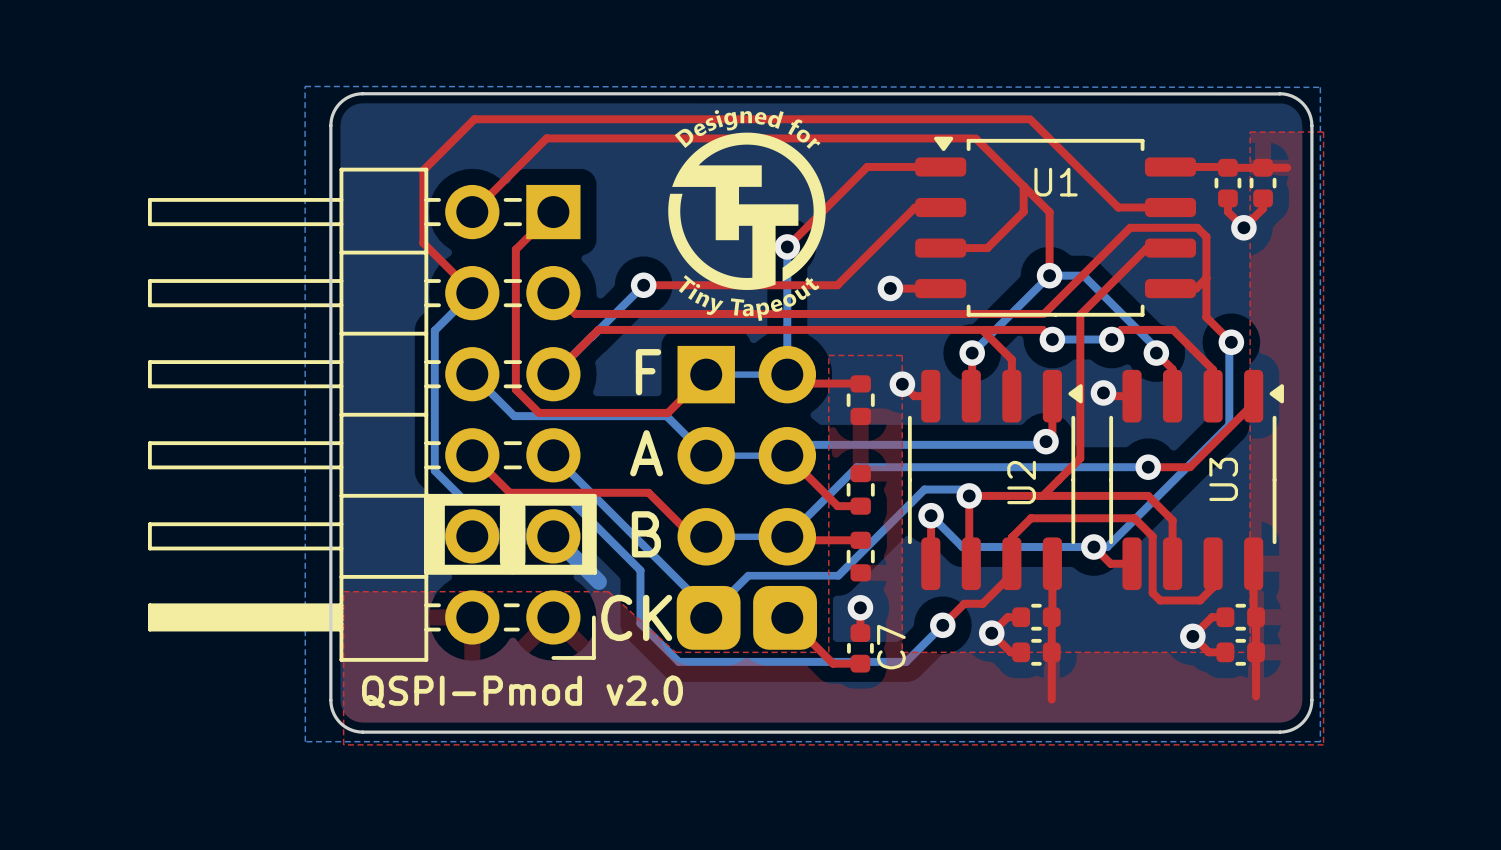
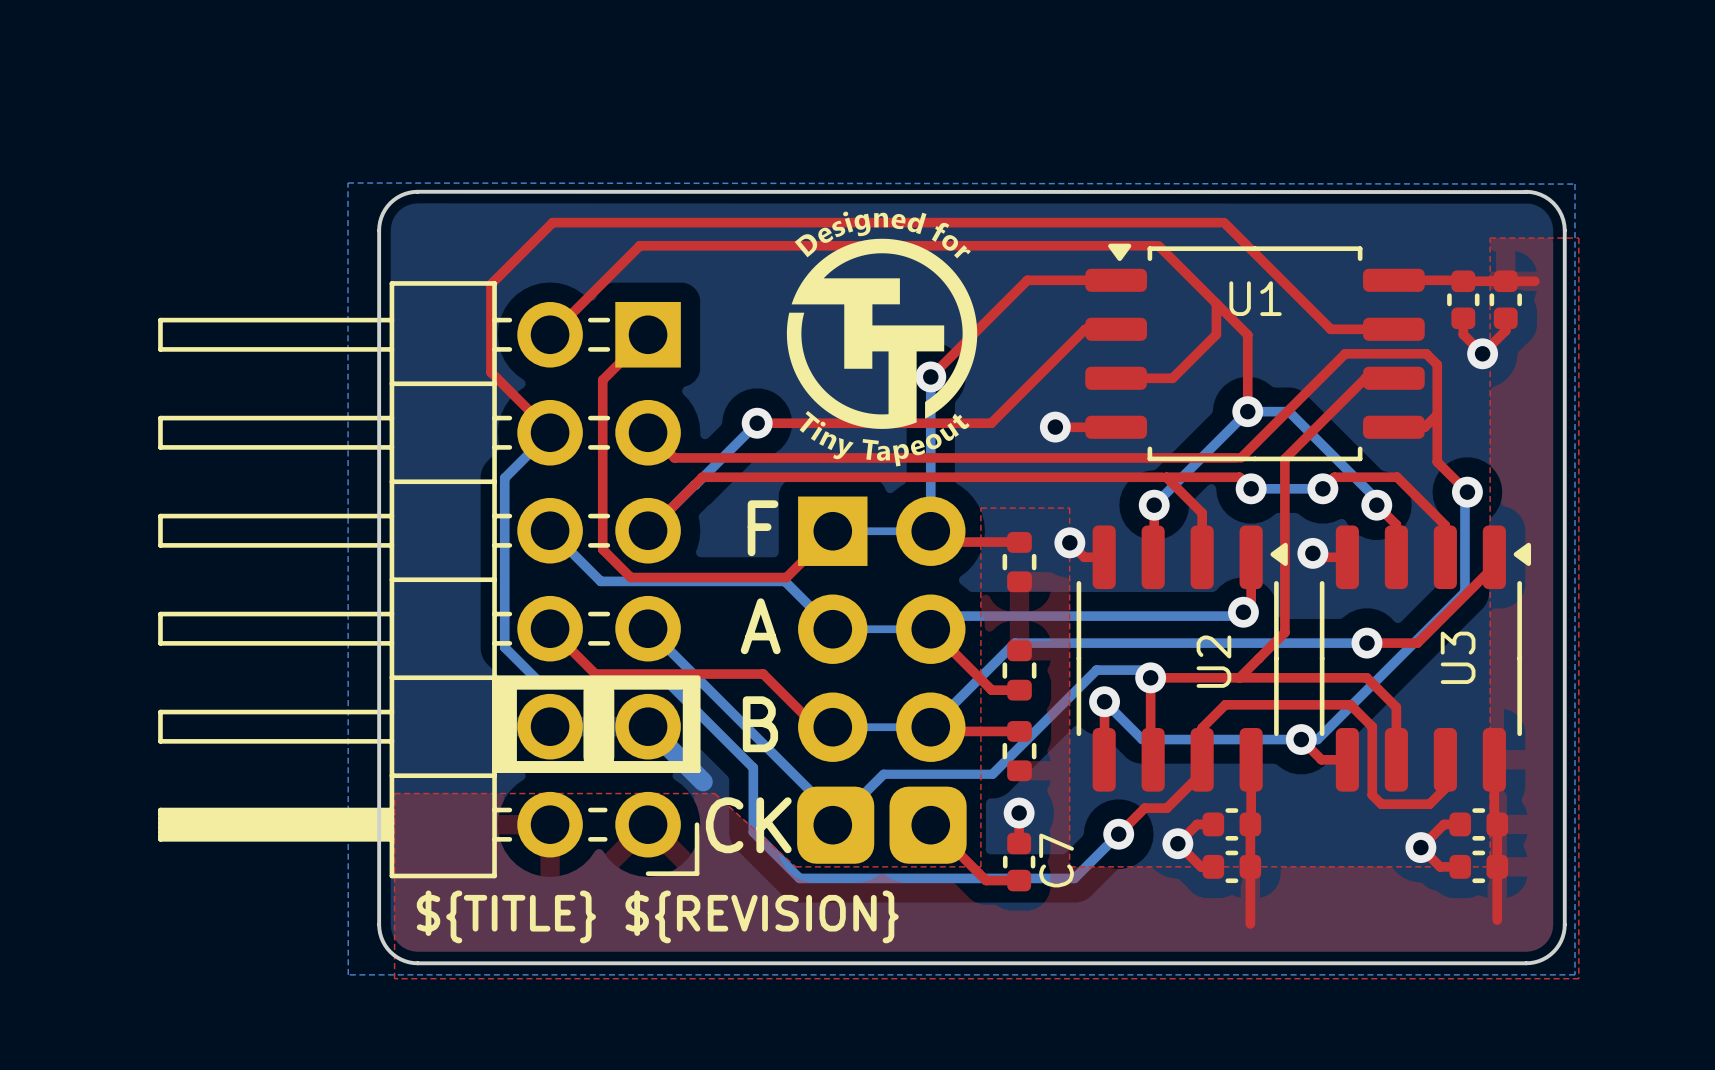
text: QSPI-Pmod v2.0 (522, 691) -> ${TITLE} ${REVISION} (657, 916)

